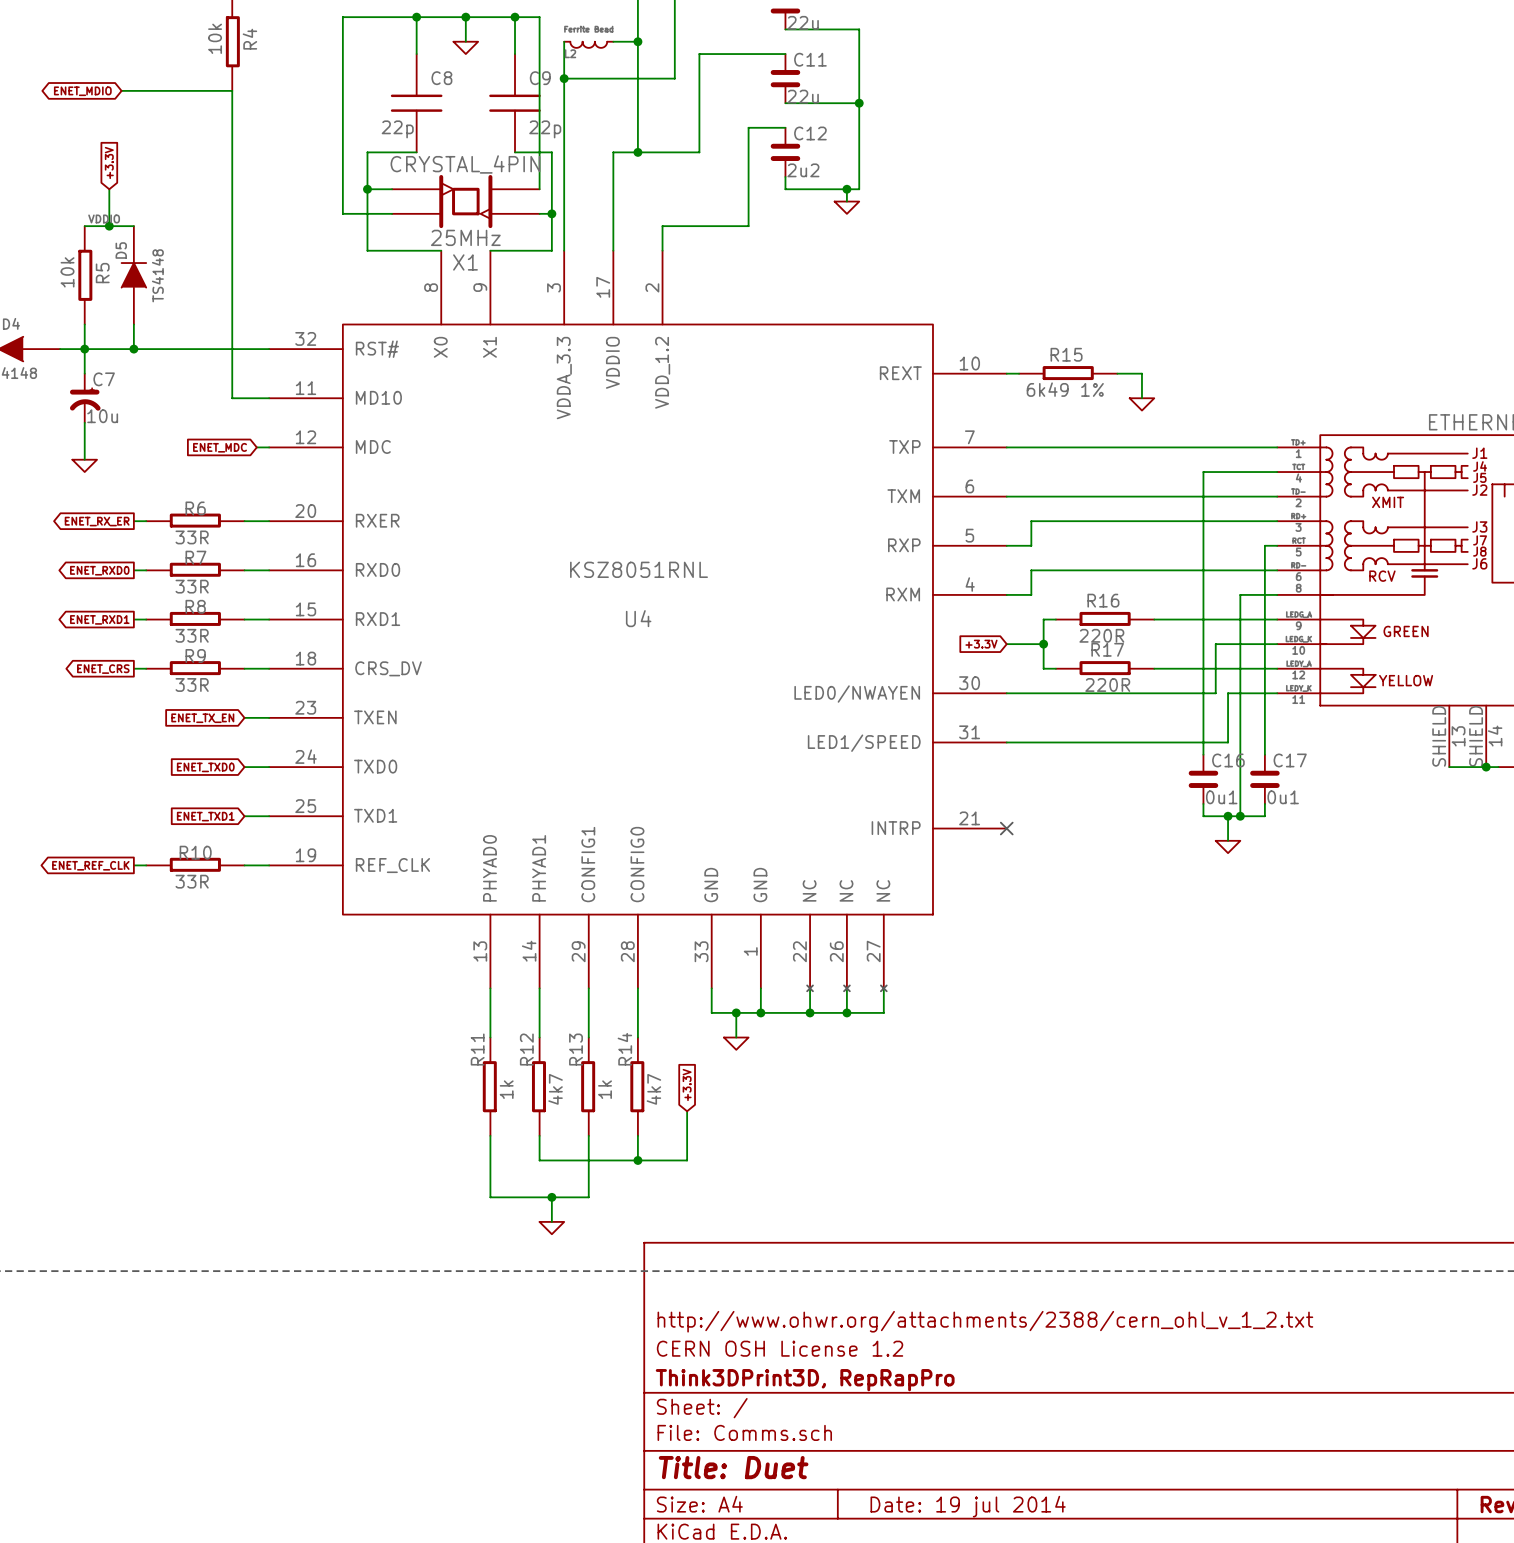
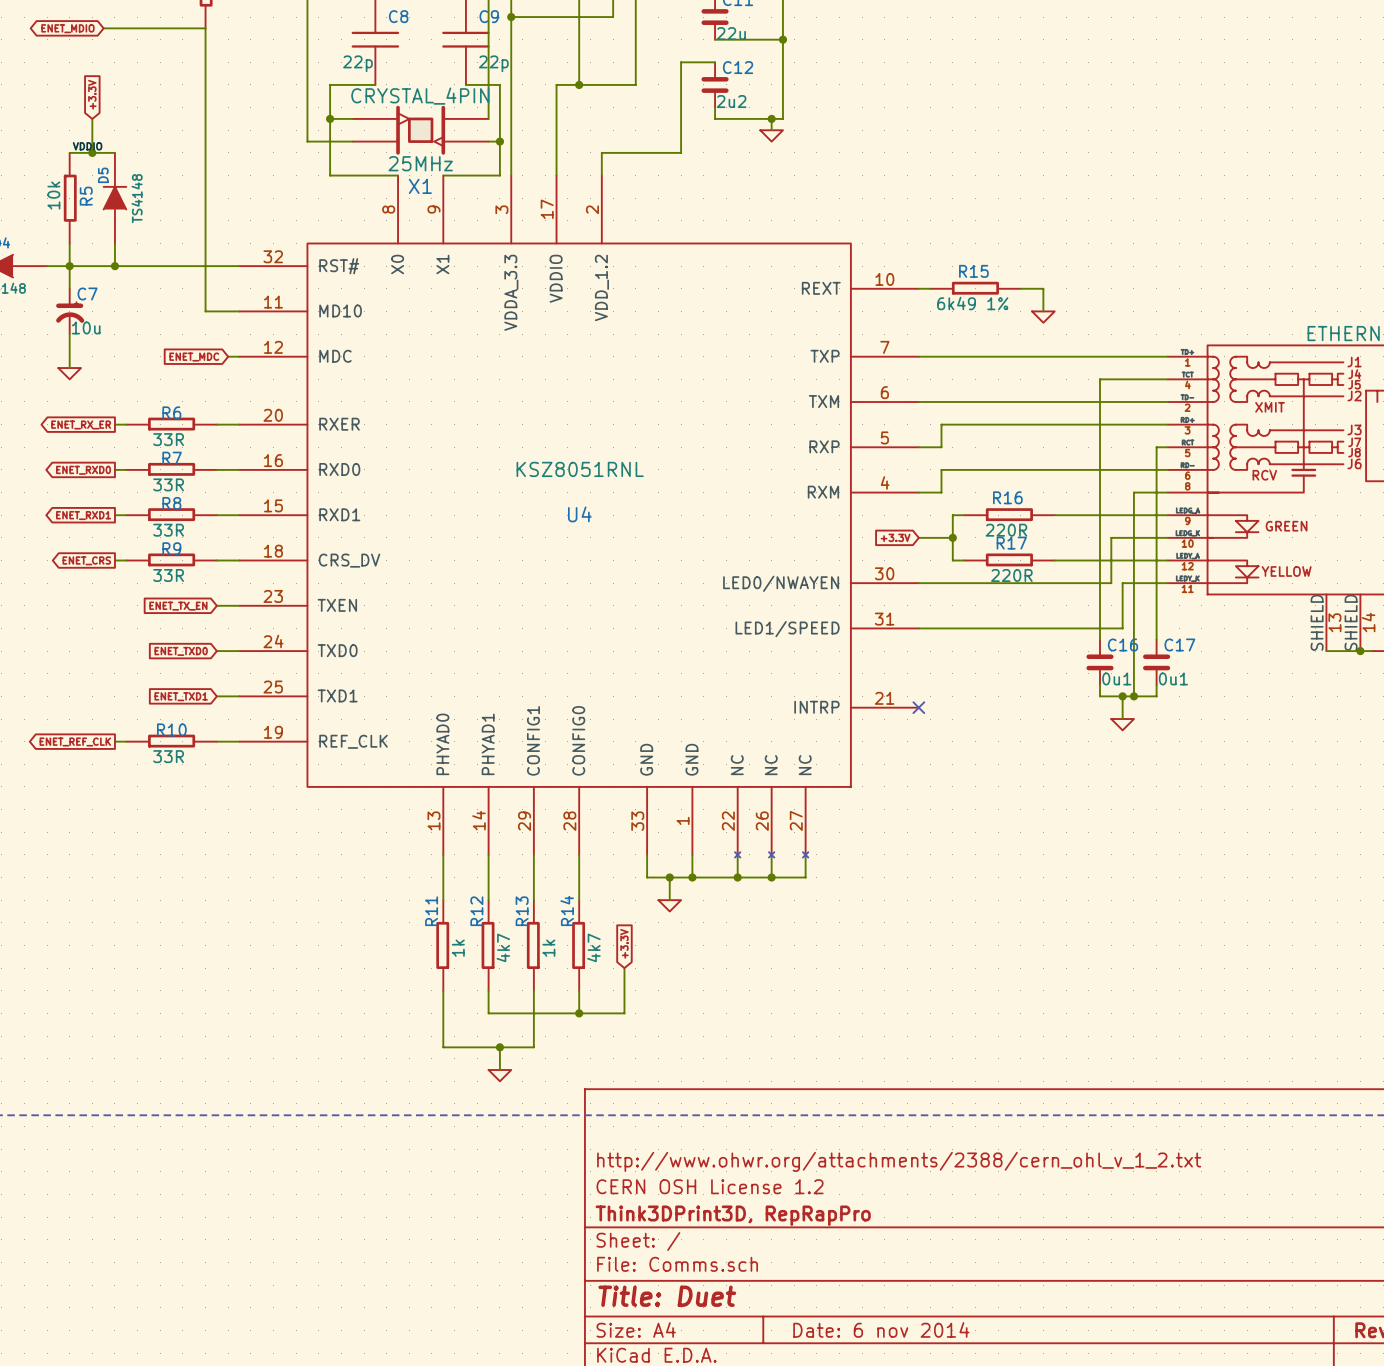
title block: Date: 19 jul 2014 (968, 1506) -> Date: 6 nov 2014 (881, 1329)

